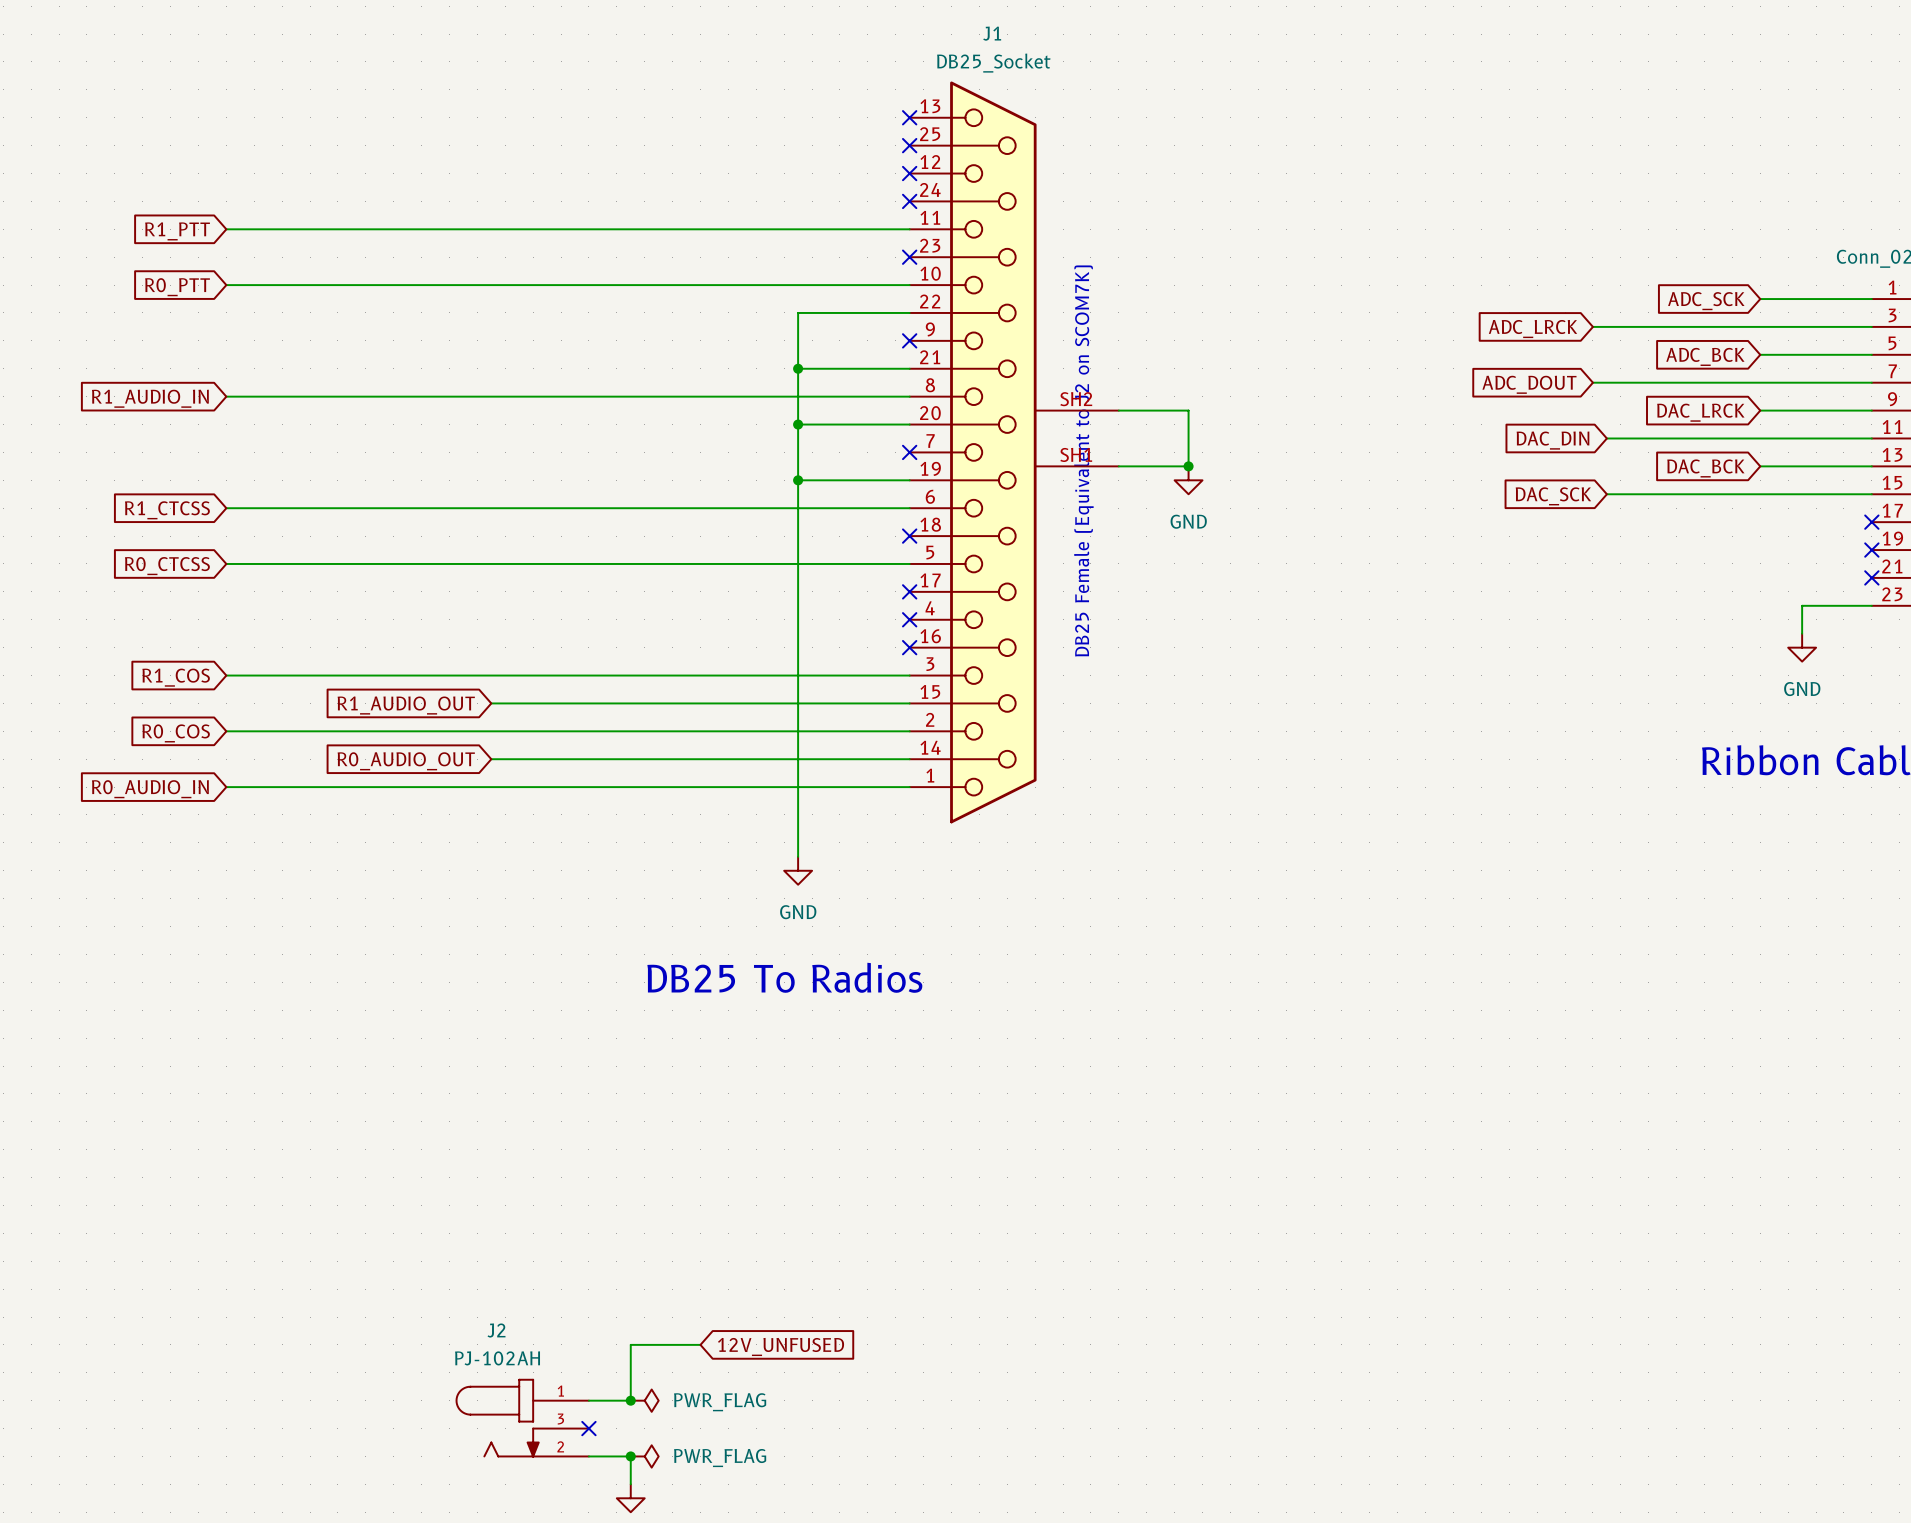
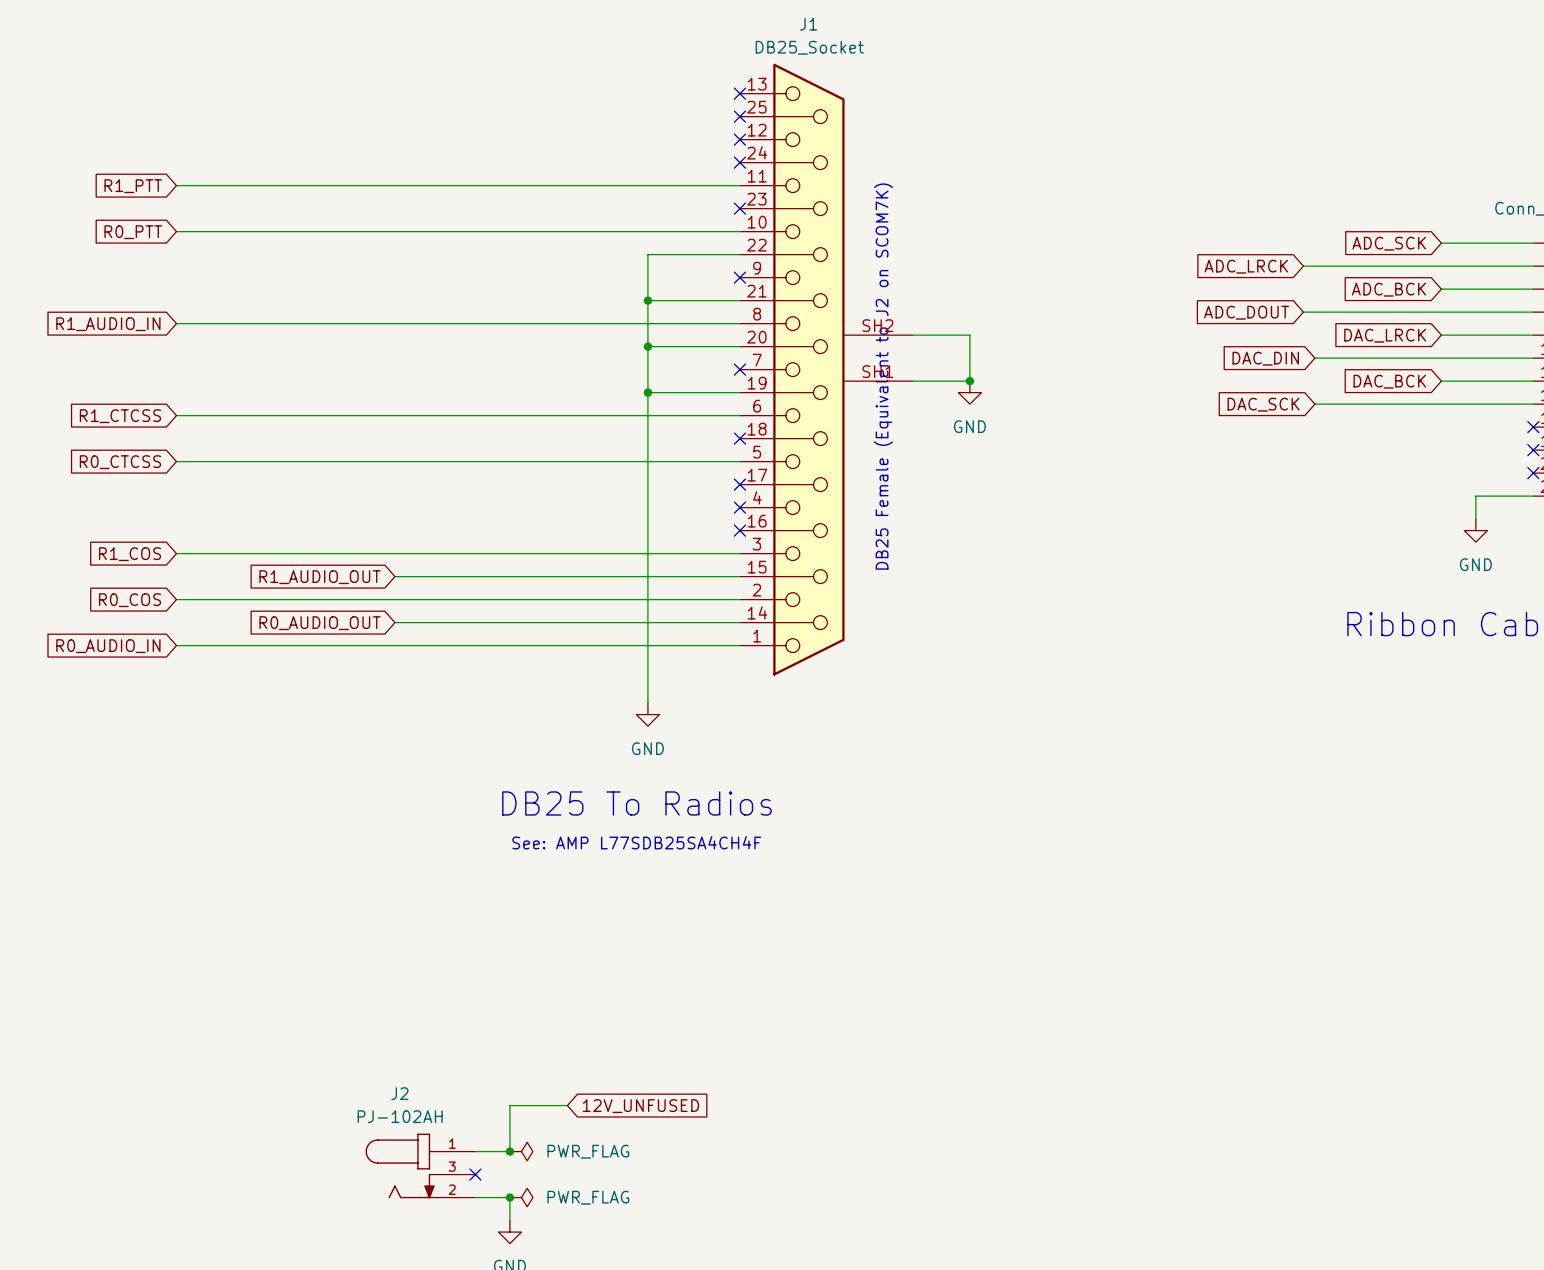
text: none -> See: AMP L77SDB25SA4CH4F (636, 842)

